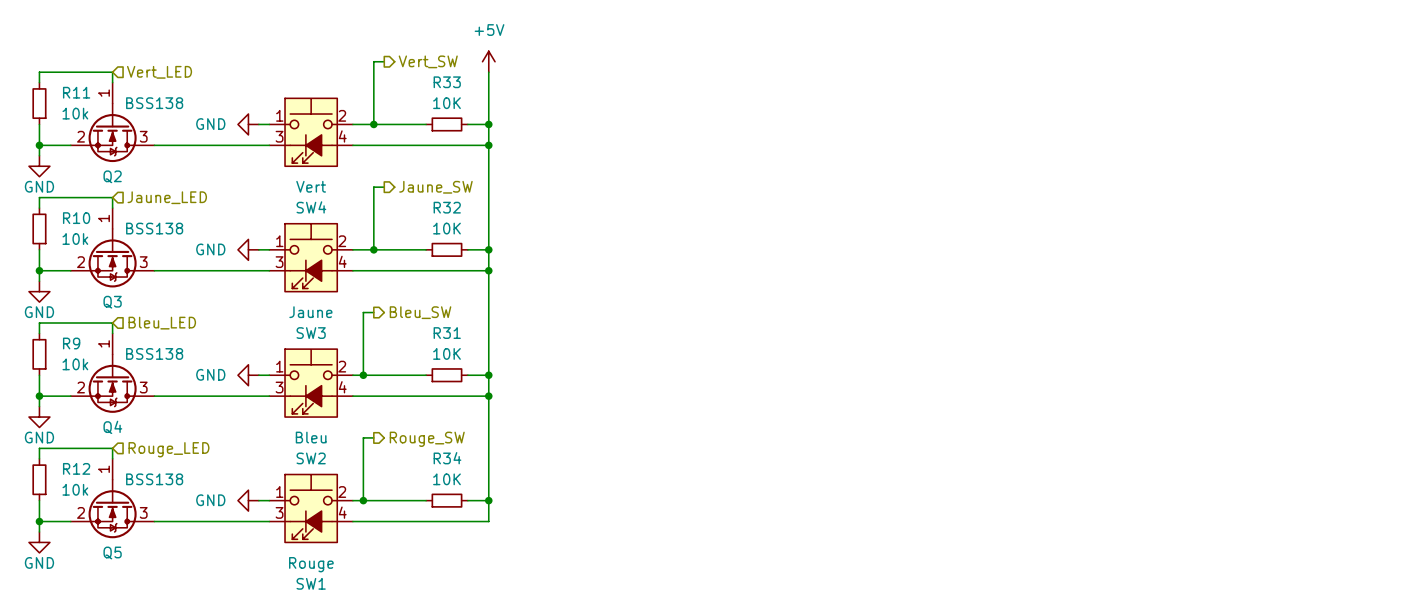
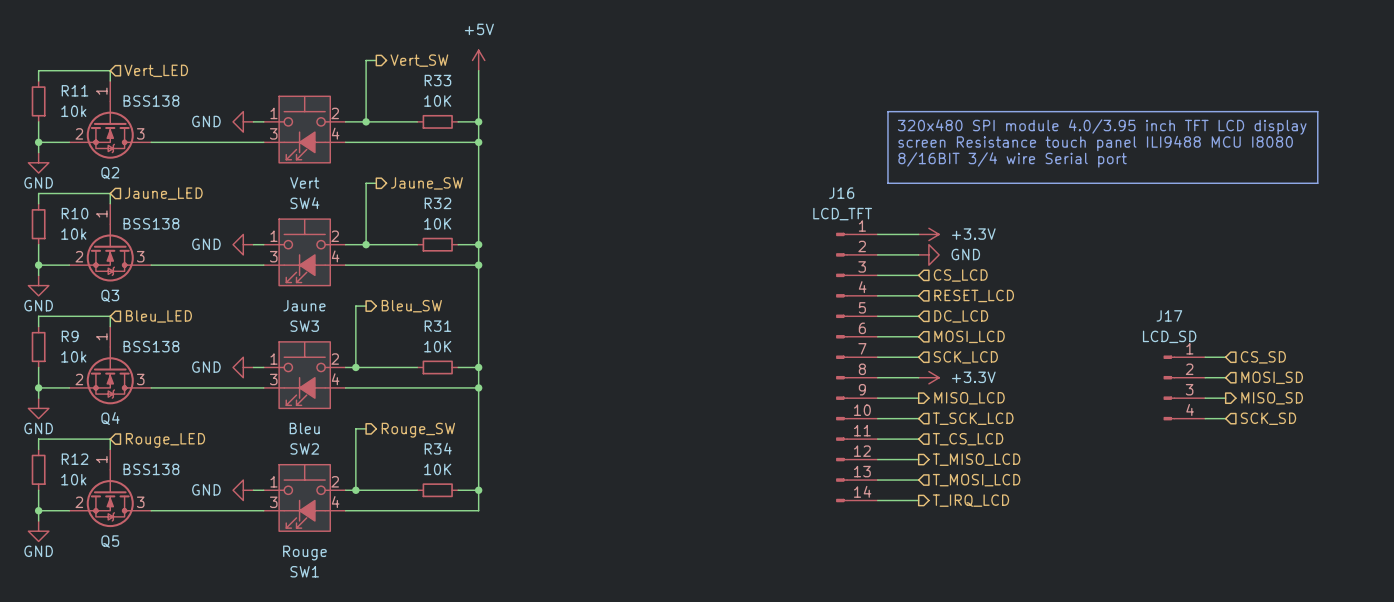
line: none -> (887, 111) (1317, 111) (1317, 183) (887, 183) (887, 111)
text: none -> 320x480 SPI module 4.0/3.95 inch TFT LCD display (1102, 127)
text: none -> screen Resistance touch panel ILI9488 MCU I8080 (1095, 143)
text: none -> 8/16BIT 3/4 wire Serial port (1012, 159)
wire: none -> (877, 234) (918, 234)
power symbol: none -> +3.3V (928, 234)
wire: none -> (877, 254) (918, 254)
power symbol: none -> GND (928, 254)
wire: none -> (877, 275) (918, 275)
hierarchical label: none -> CS_LCD (960, 275)
wire: none -> (877, 295) (918, 295)
hierarchical label: none -> RESET_LCD (974, 295)
wire: none -> (877, 316) (918, 316)
hierarchical label: none -> DC_LCD (961, 316)
wire: none -> (877, 336) (918, 336)
hierarchical label: none -> MOSI_LCD (969, 336)
wire: none -> (877, 357) (918, 357)
hierarchical label: none -> SCK_LCD (965, 357)
wire: none -> (1205, 357) (1225, 357)
hierarchical label: none -> CS_SD (1263, 357)
J16: none -> LCD_TFT (856, 367)
wire: none -> (877, 377) (918, 377)
power symbol: none -> +3.3V (928, 377)
wire: none -> (1205, 377) (1225, 377)
hierarchical label: none -> MOSI_SD (1272, 377)
J17: none -> LCD_SD (1184, 387)
wire: none -> (877, 398) (918, 398)
hierarchical label: none -> MISO_LCD (969, 398)
wire: none -> (1205, 398) (1225, 398)
hierarchical label: none -> MISO_SD (1272, 398)
wire: none -> (877, 418) (918, 418)
hierarchical label: none -> T_SCK_LCD (973, 418)
wire: none -> (1205, 418) (1225, 418)
hierarchical label: none -> SCK_SD (1268, 418)
wire: none -> (877, 439) (918, 439)
hierarchical label: none -> T_CS_LCD (968, 439)
wire: none -> (877, 459) (918, 459)
hierarchical label: none -> T_MISO_LCD (976, 459)
wire: none -> (877, 480) (918, 480)
hierarchical label: none -> T_MOSI_LCD (976, 480)
wire: none -> (877, 500) (918, 500)
hierarchical label: none -> T_IRQ_LCD (970, 500)

